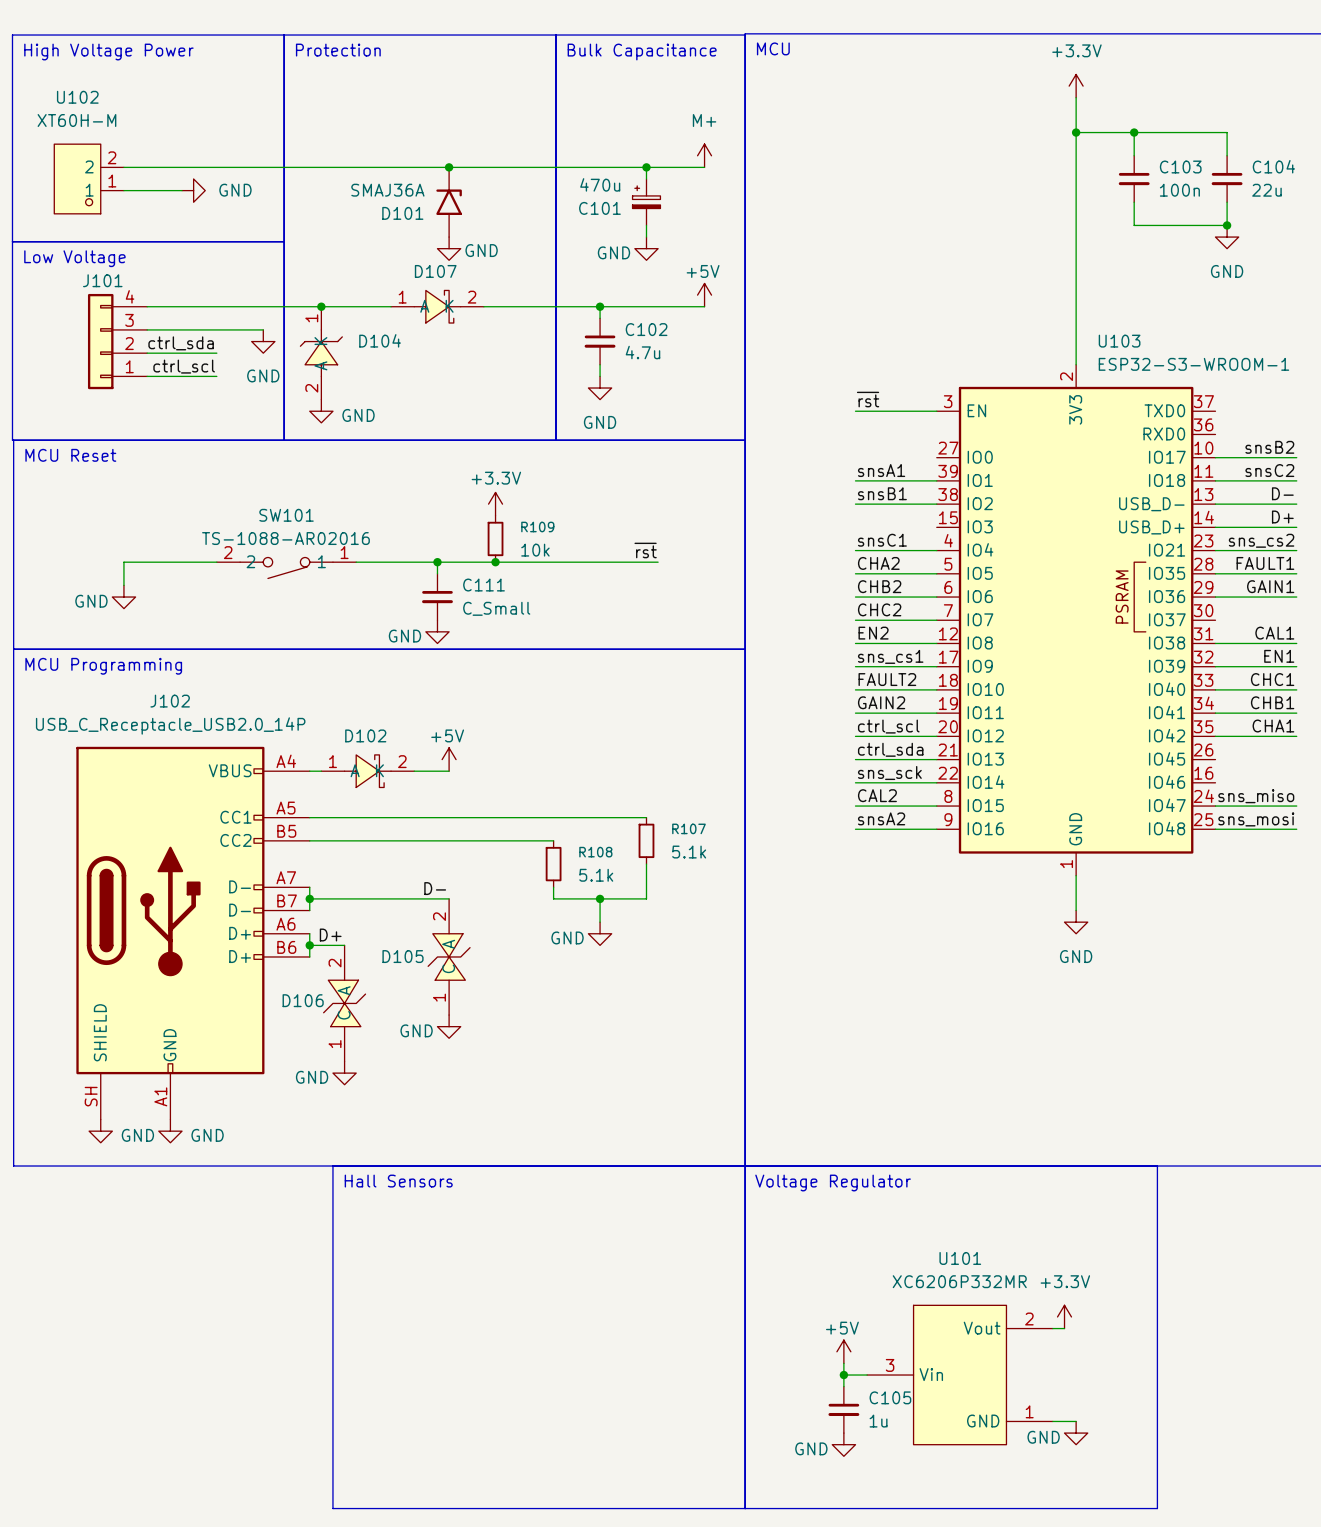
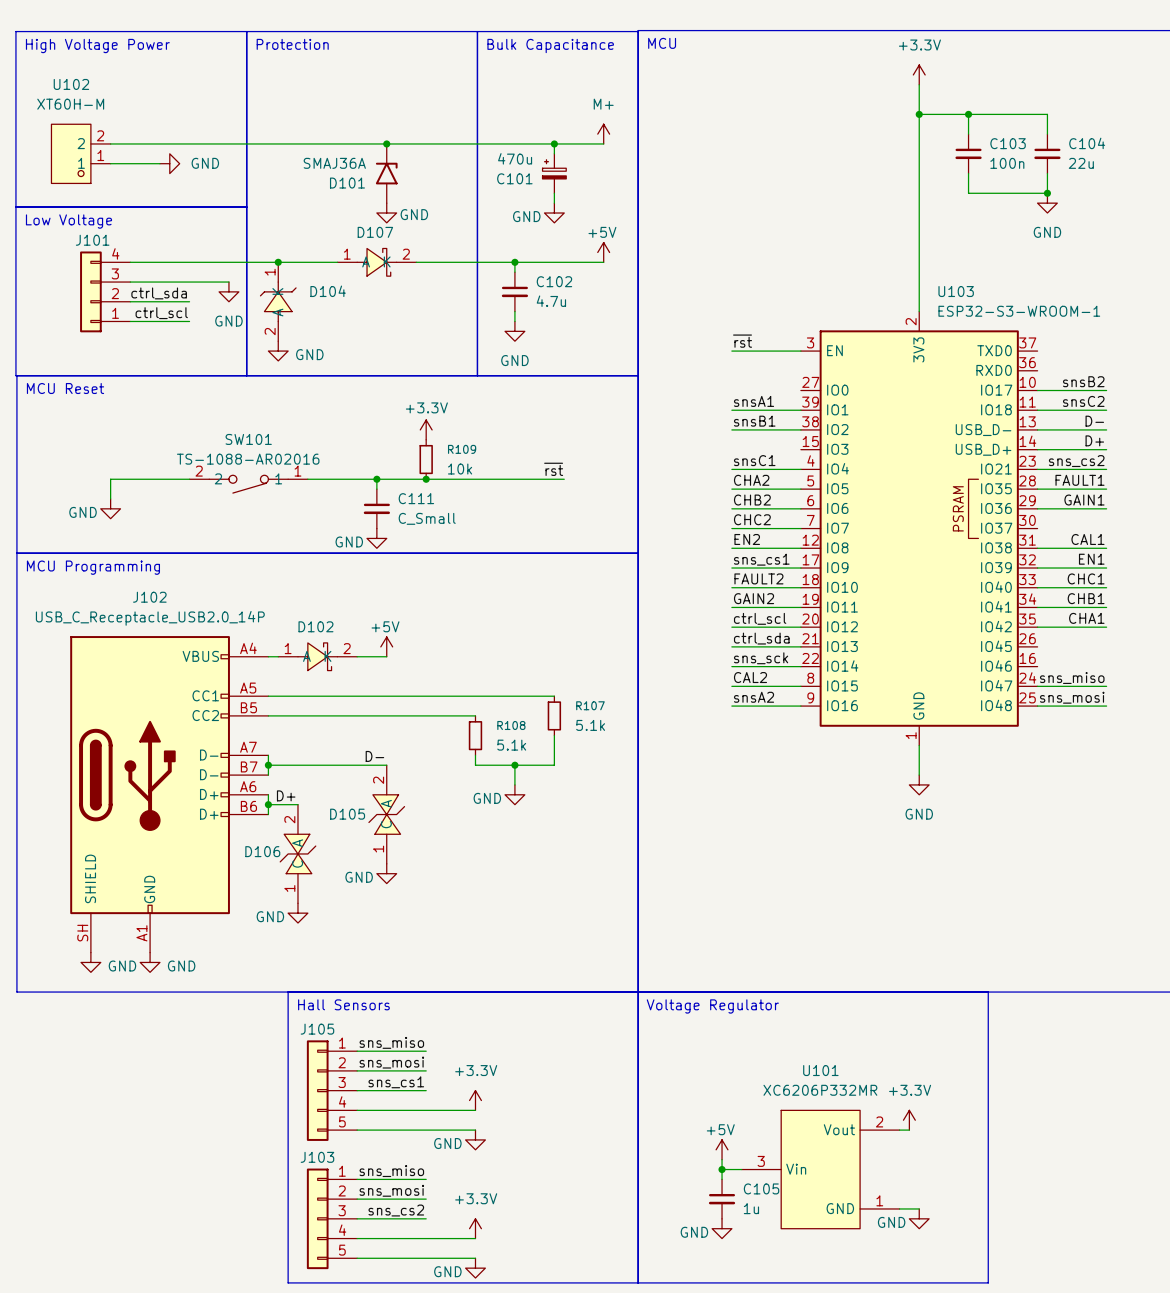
label: none -> sns_miso (391, 1042)
wire: none -> (357, 1051) (426, 1051)
label: none -> sns_mosi (391, 1062)
wire: none -> (357, 1070) (426, 1070)
label: none -> sns_cs1 (396, 1082)
J105: none -> (332, 1090)
wire: none -> (357, 1090) (426, 1090)
power symbol: none -> +3.3V (475, 1100)
wire: none -> (357, 1110) (475, 1110)
wire: none -> (357, 1130) (475, 1130)
power symbol: none -> GND (475, 1139)
label: none -> sns_miso (391, 1171)
wire: none -> (357, 1179) (426, 1179)
label: none -> sns_mosi (391, 1190)
wire: none -> (357, 1199) (426, 1199)
label: none -> sns_cs2 (396, 1210)
J103: none -> (332, 1218)
wire: none -> (357, 1218) (426, 1218)
power symbol: none -> +3.3V (475, 1228)
wire: none -> (357, 1238) (475, 1238)
wire: none -> (357, 1258) (475, 1258)
power symbol: none -> GND (475, 1268)

